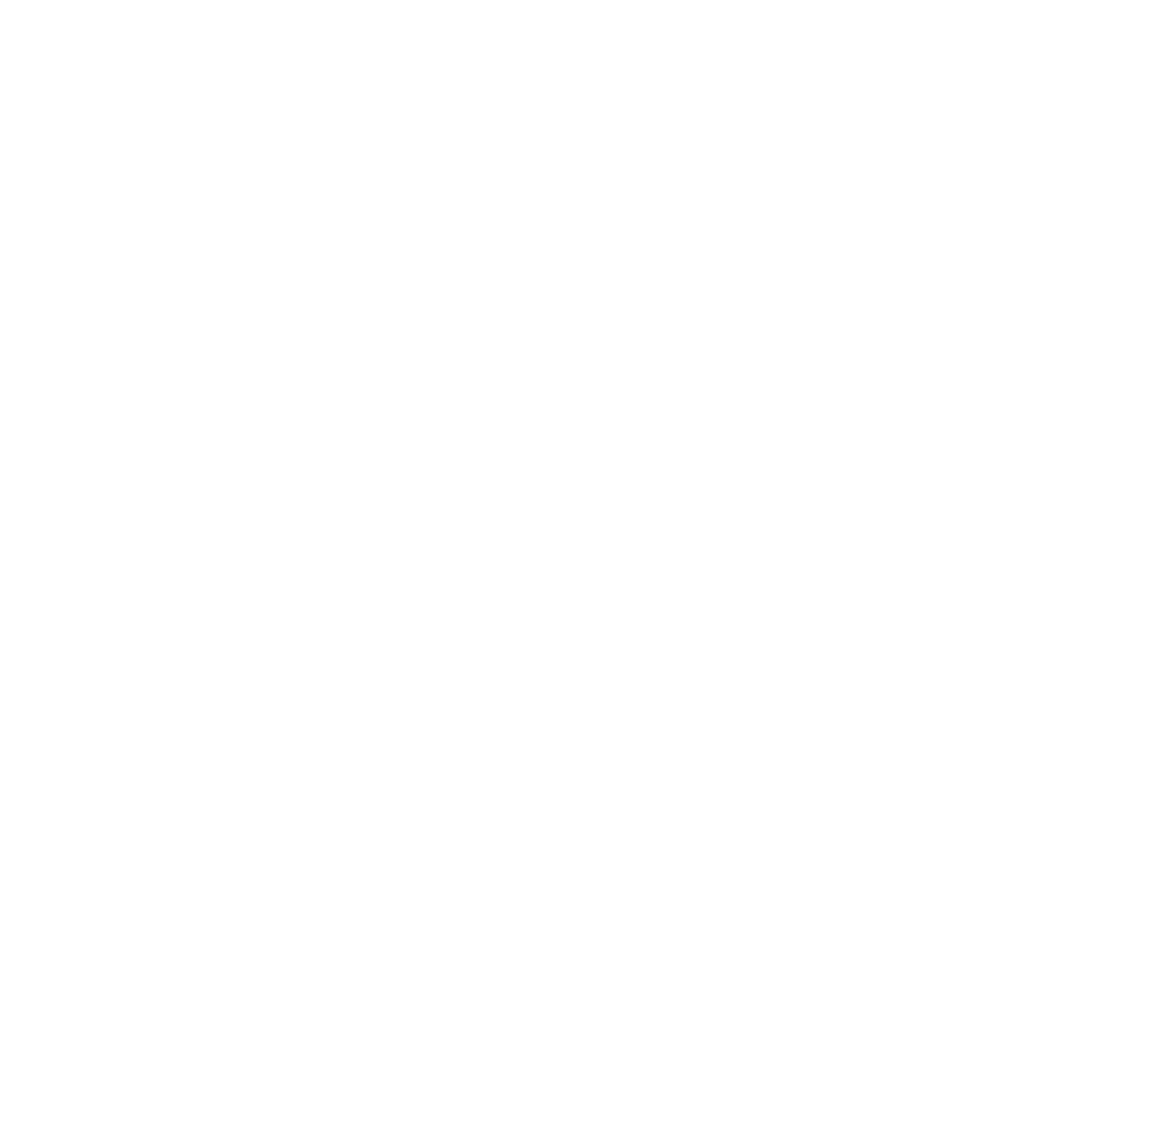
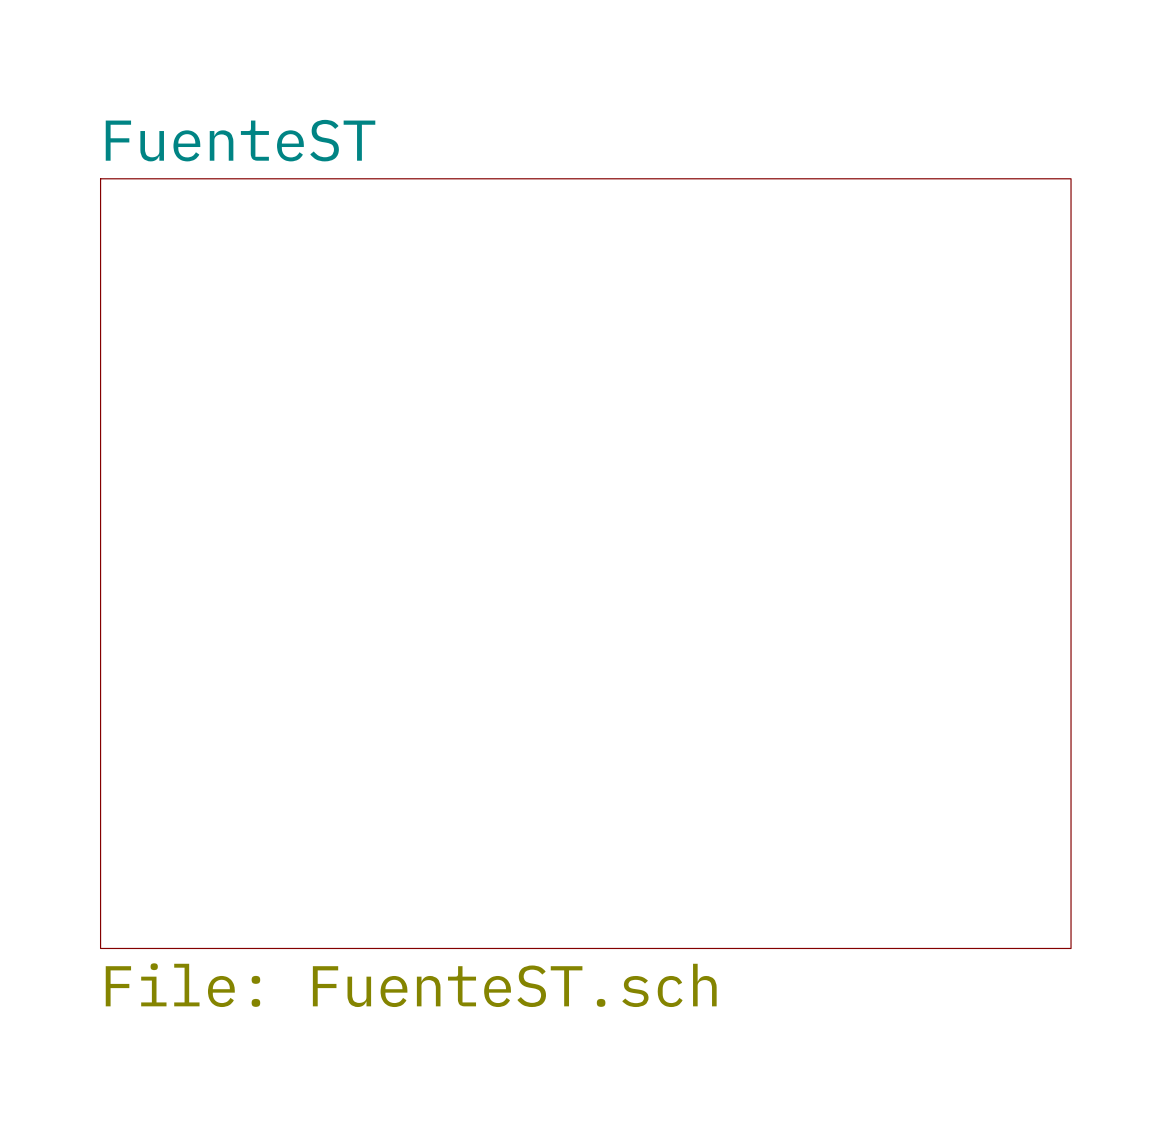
sheet FuenteST: none -> File: FuenteST.sch (585, 563)

